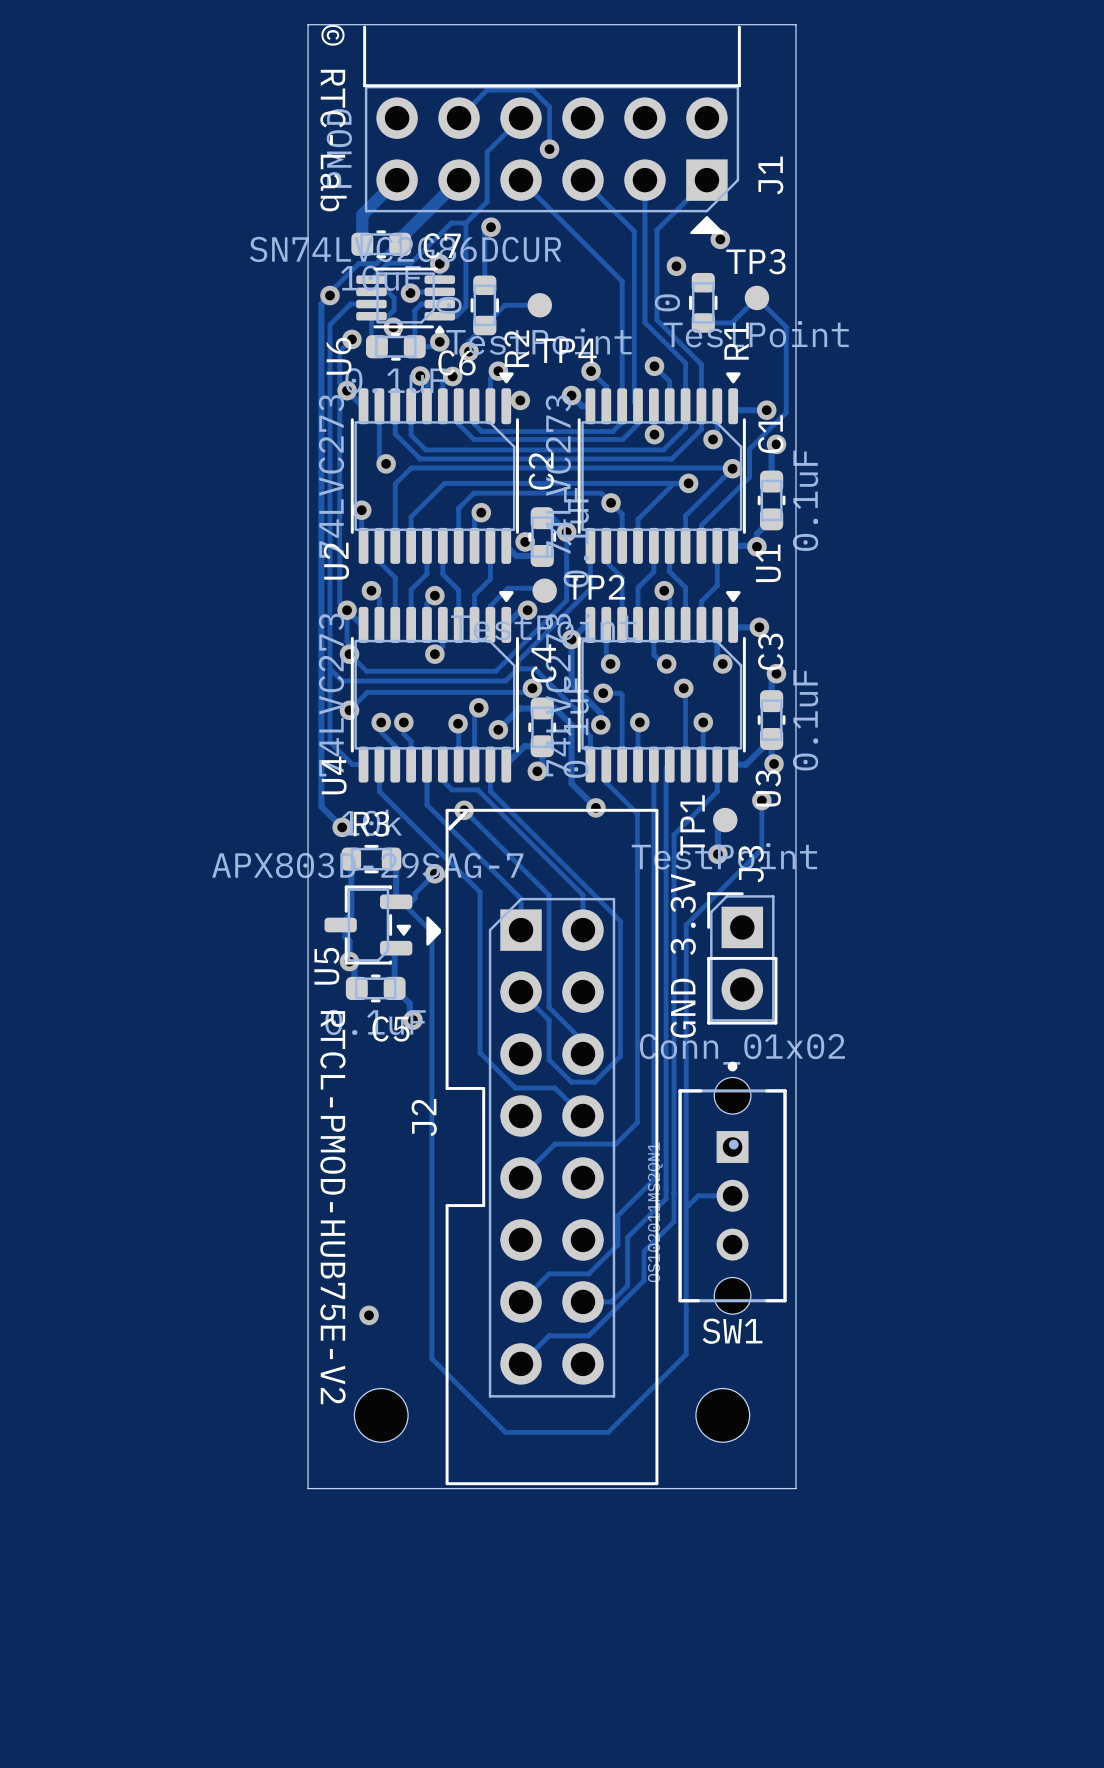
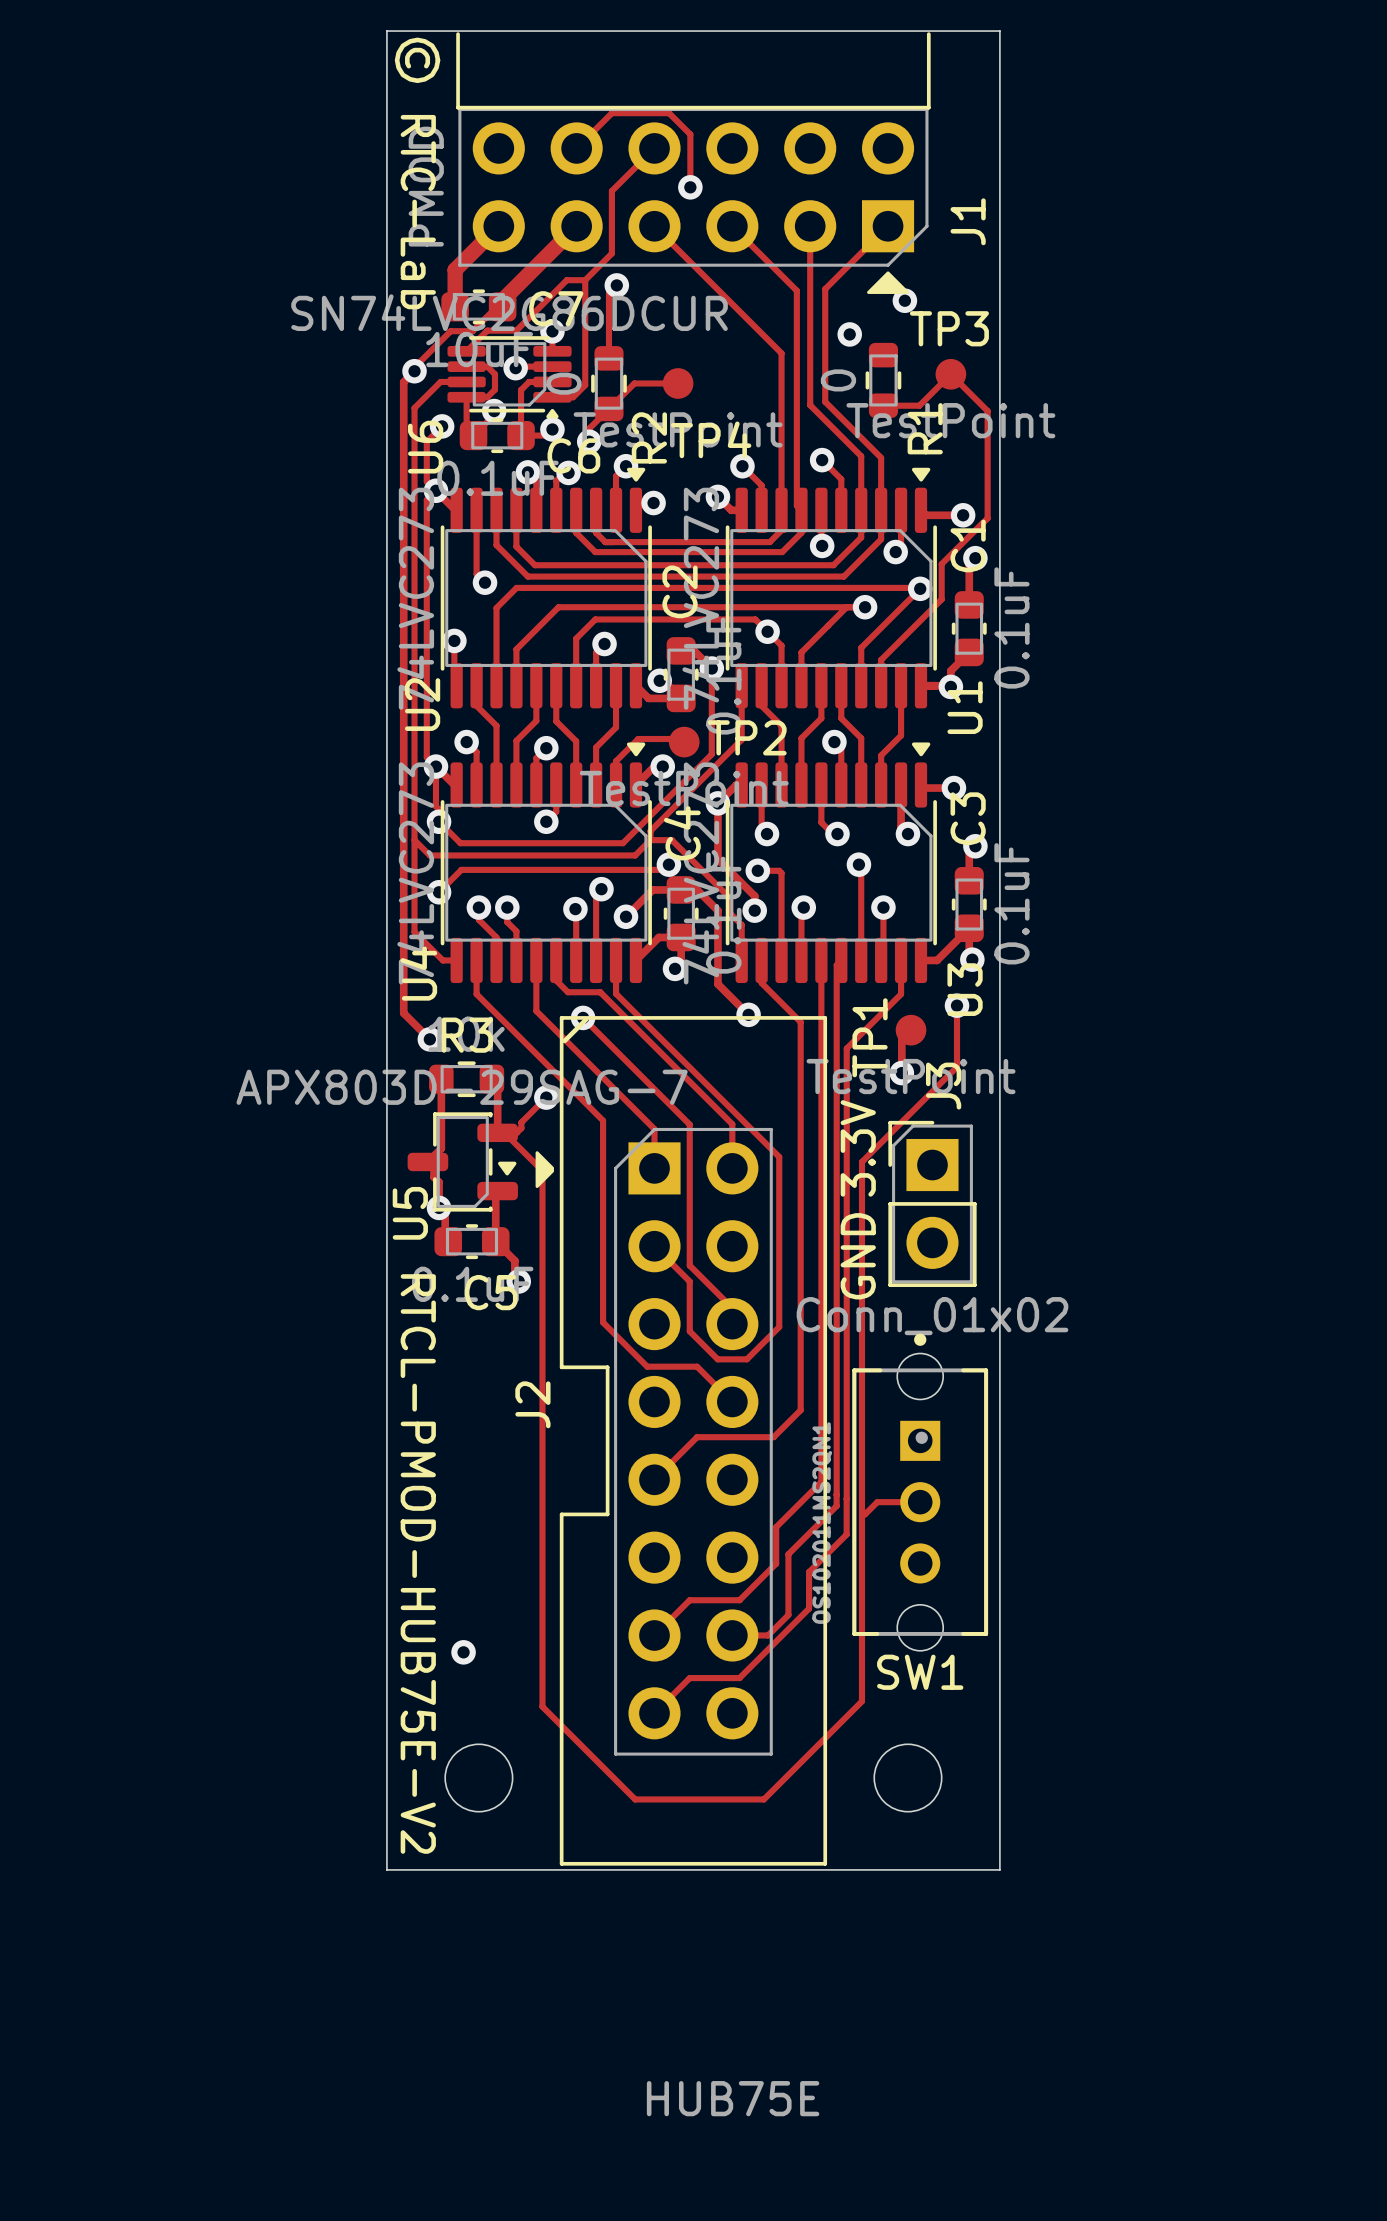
J2 value: none -> HUB75E (733, 2098)

